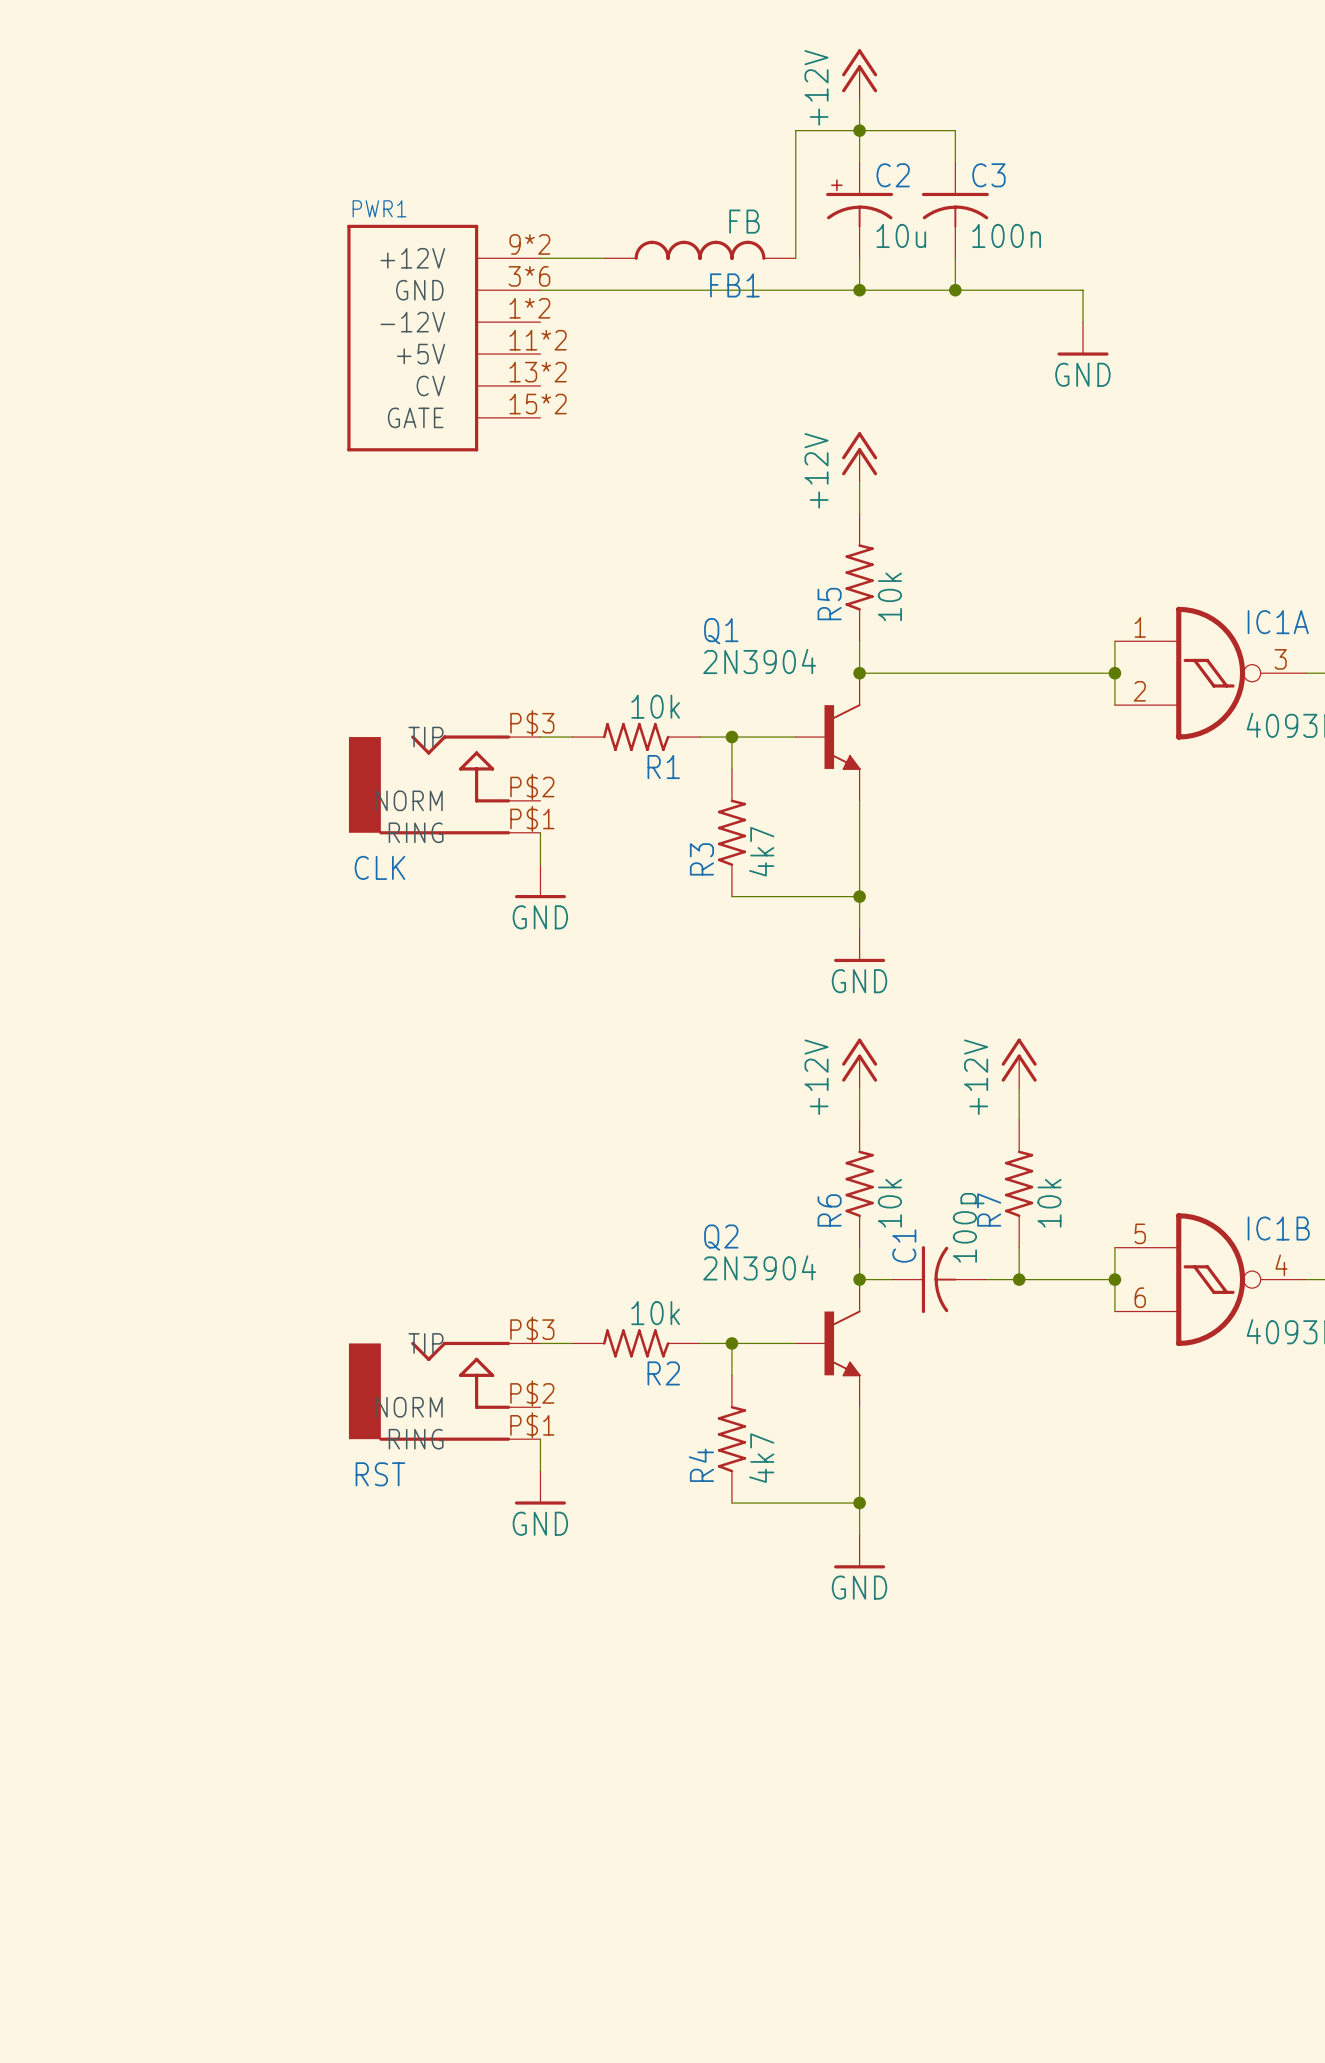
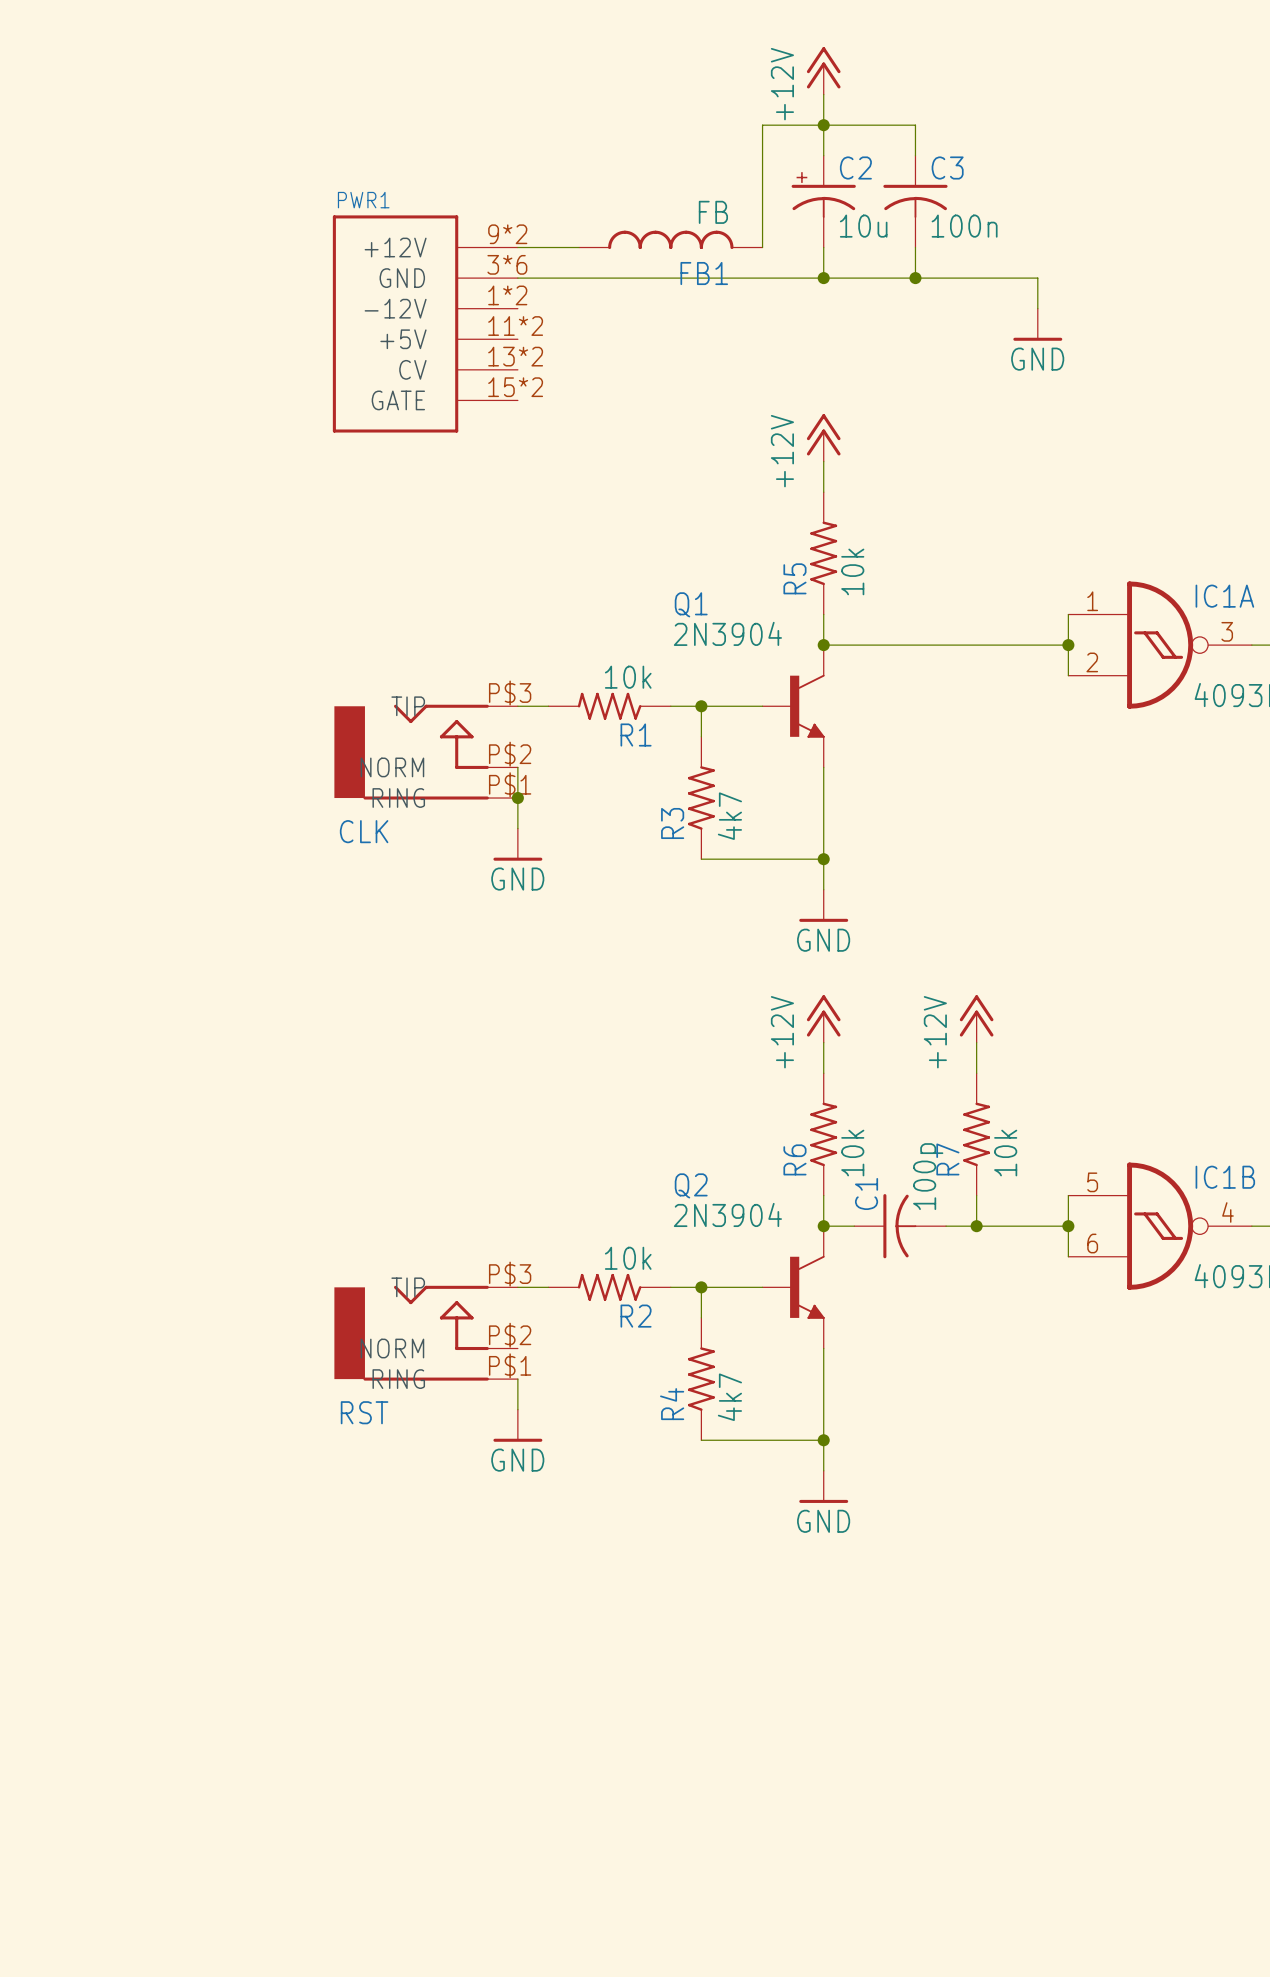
wire: none -> (517, 767) (517, 798)
junction: none -> (517, 798)

